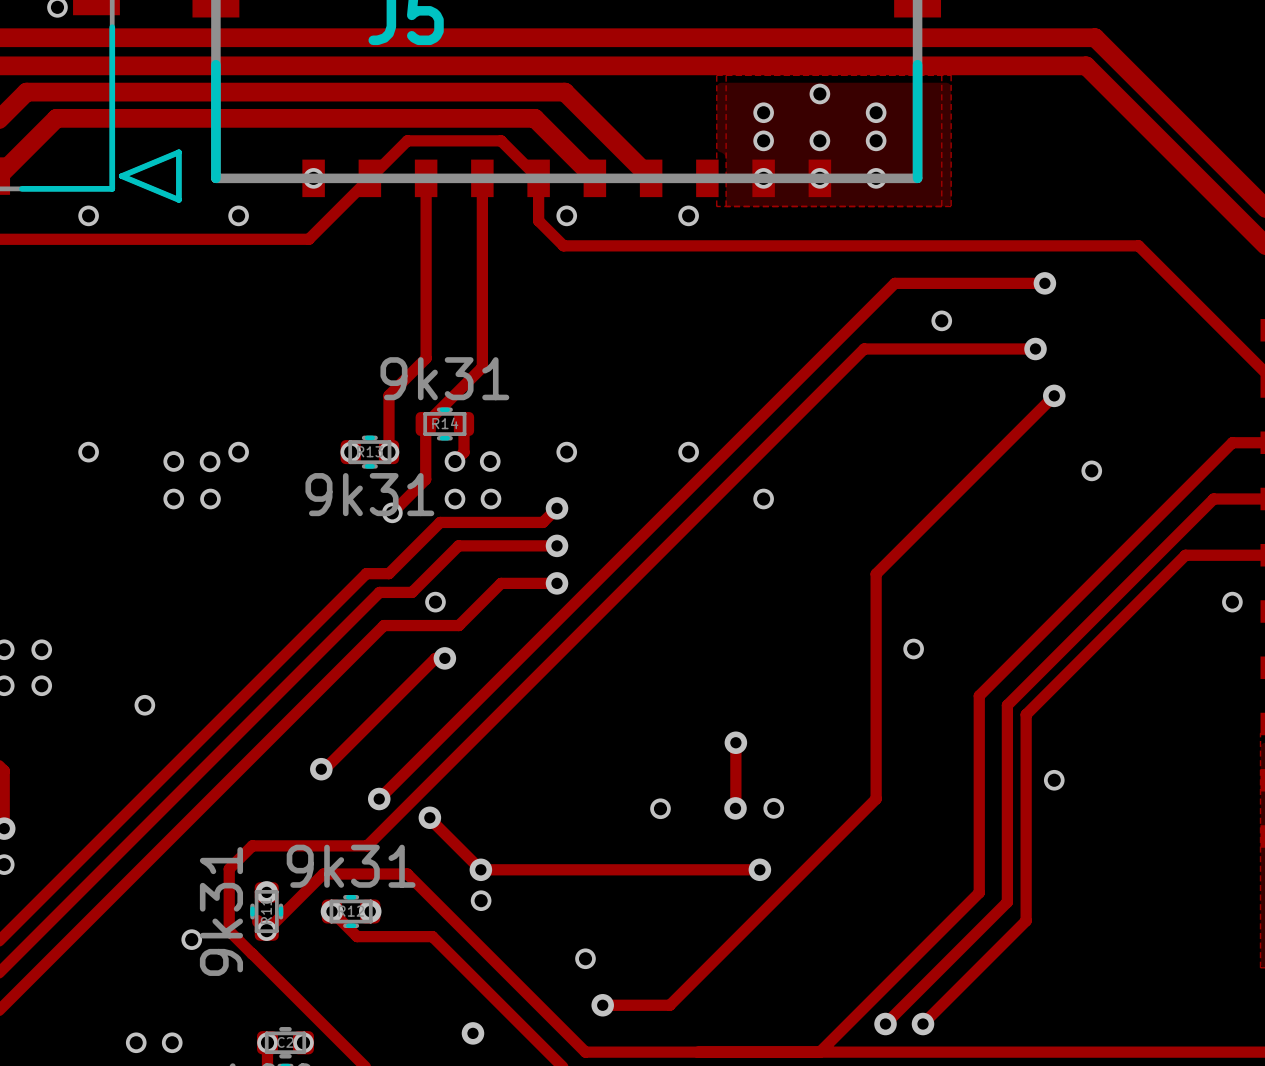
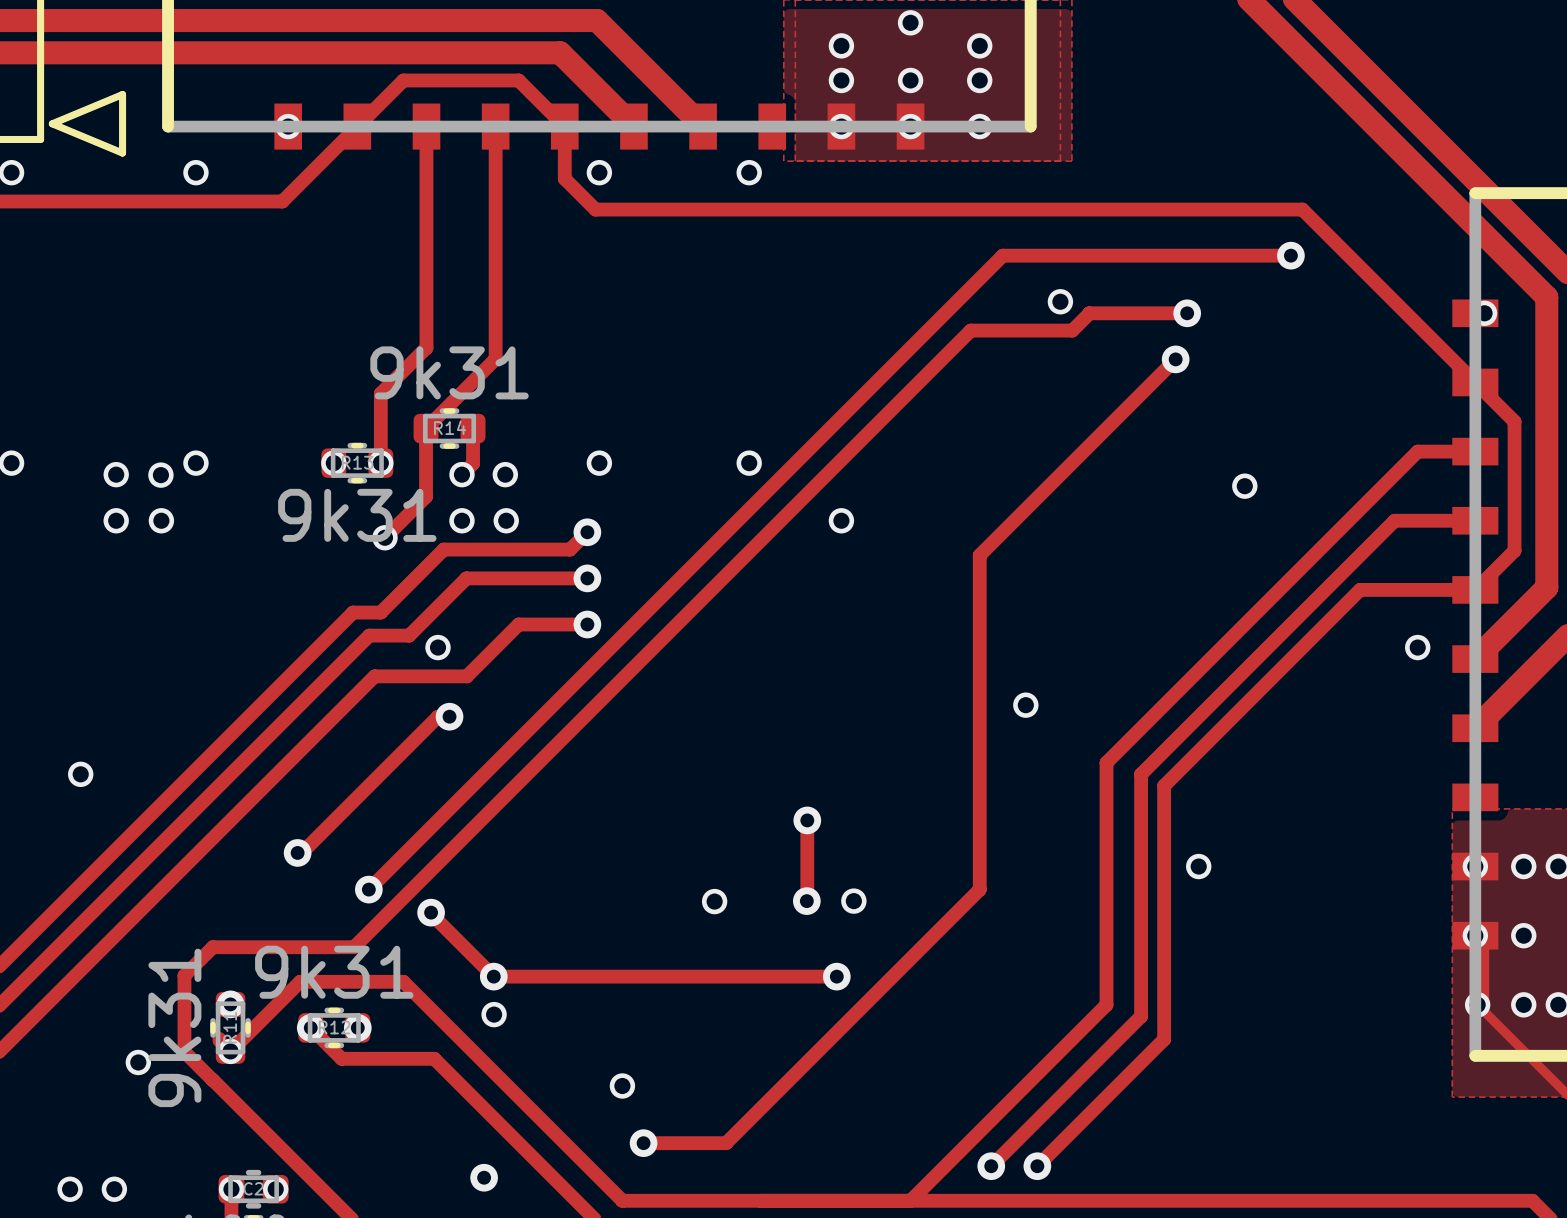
track: none -> (1187, 255) (1290, 255)
via: (1044, 283) -> none
via: none -> (1290, 255)
track: none -> (1089, 313) (1187, 313)
via: none -> (1187, 313)
track: (864, 348) (1035, 348) -> (965, 336) (970, 330) (1072, 330) (1089, 313)
via: (1035, 348) -> none
via: none -> (1175, 359)
track: (1054, 395) (876, 574) -> (1175, 359) (979, 555) (979, 612)
via: (1054, 395) -> none

